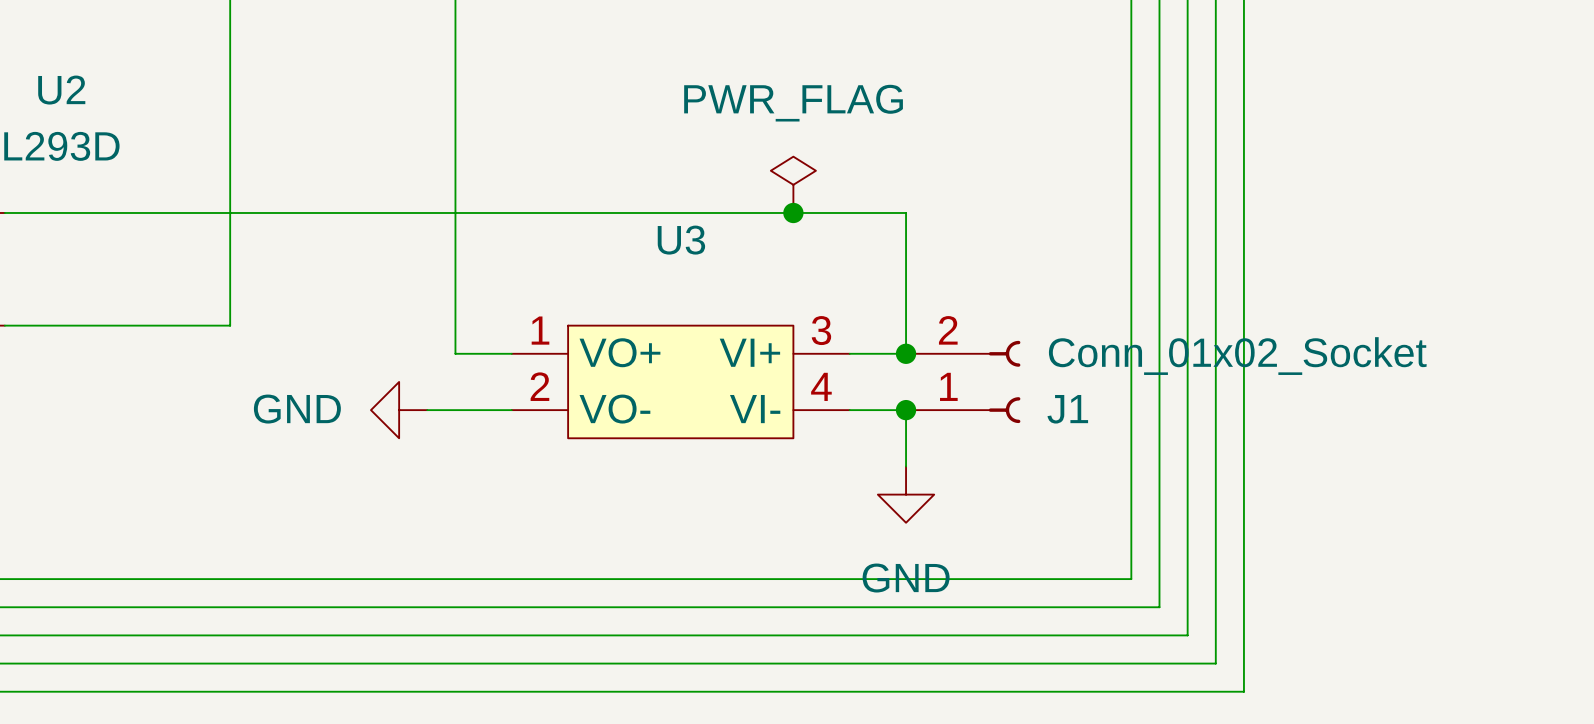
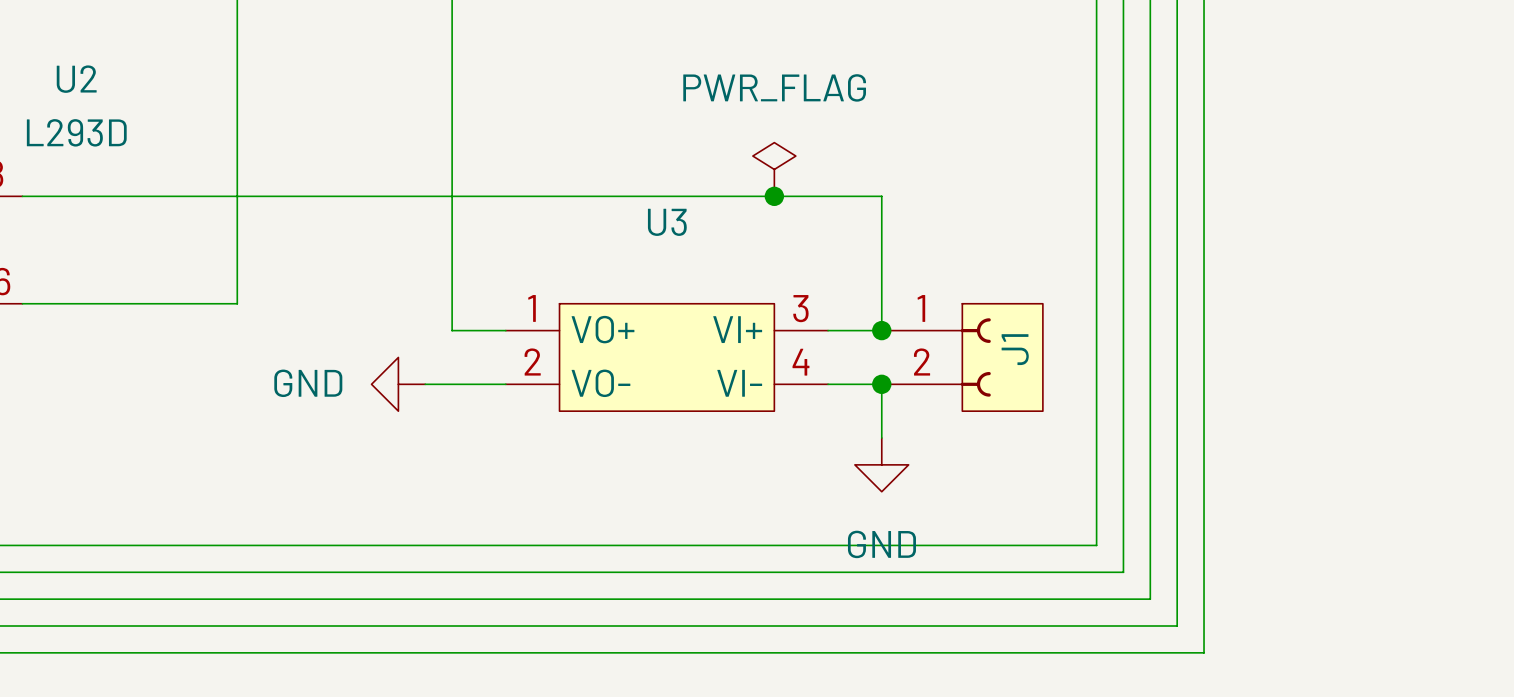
J1 symbol: [906, 340, 1021, 424] -> [881, 303, 1043, 412]
J1 value: Conn_01x02_Socket (1237, 356) -> none
J1 name position: J1 (1067, 409) -> J1 (1015, 349)

